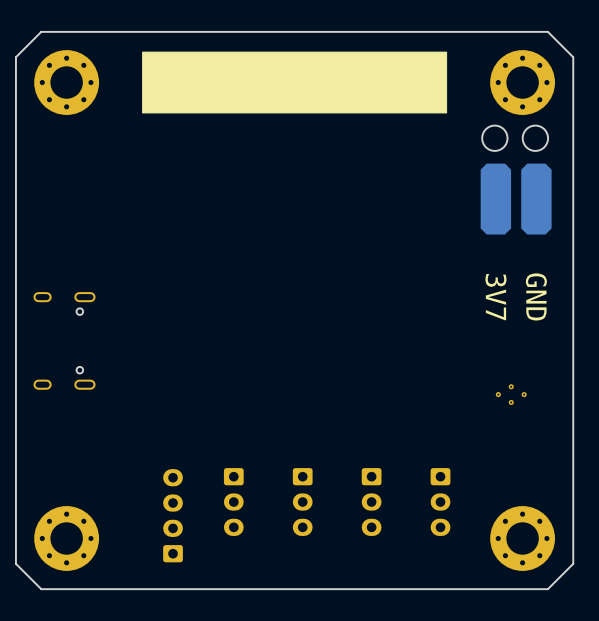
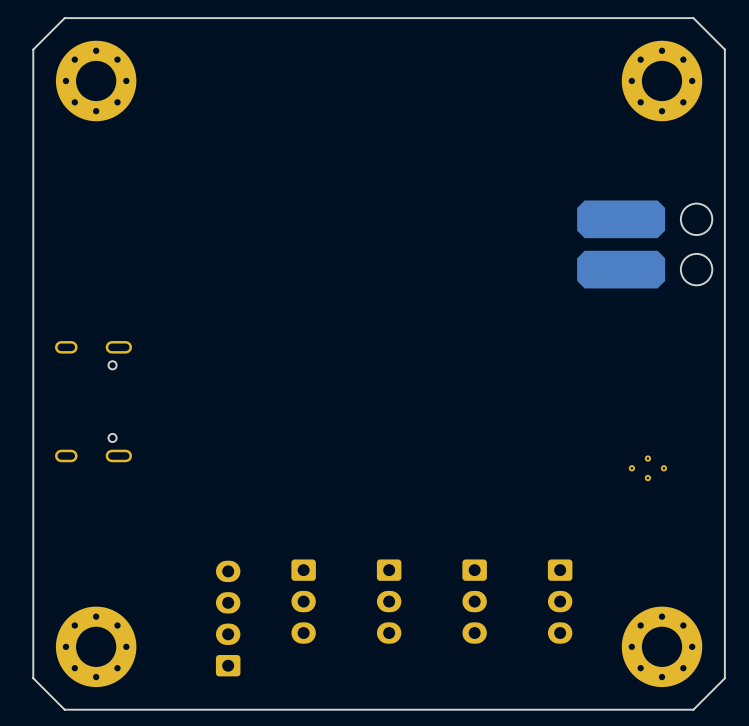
drawing: [142, 51, 448, 114] -> none
part: (516, 180) -> none
part: none -> (644, 244)
text: GND (536, 296) -> none
text: 3V7 (495, 297) -> none

